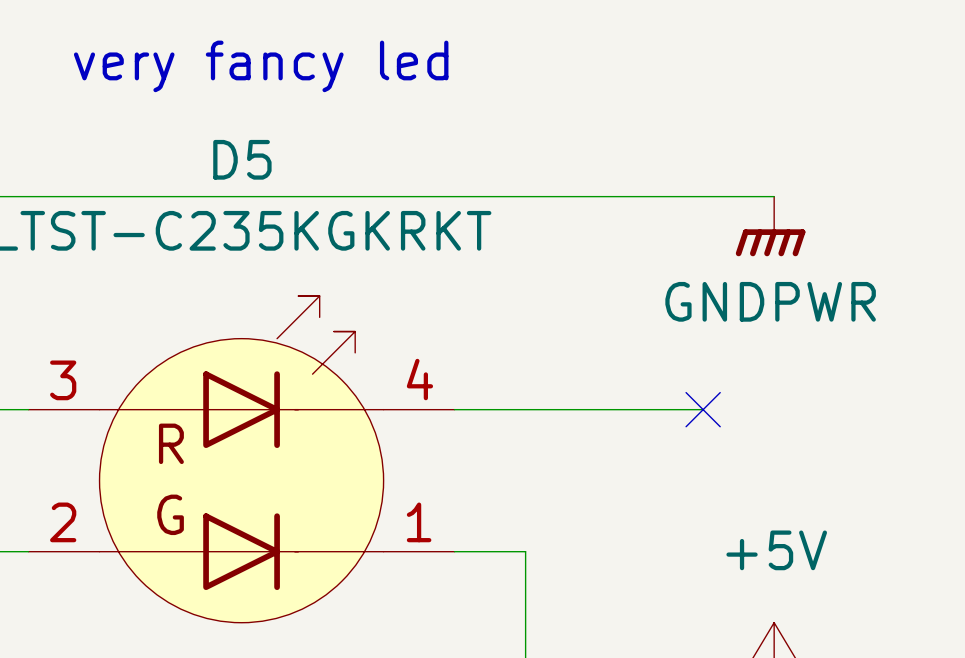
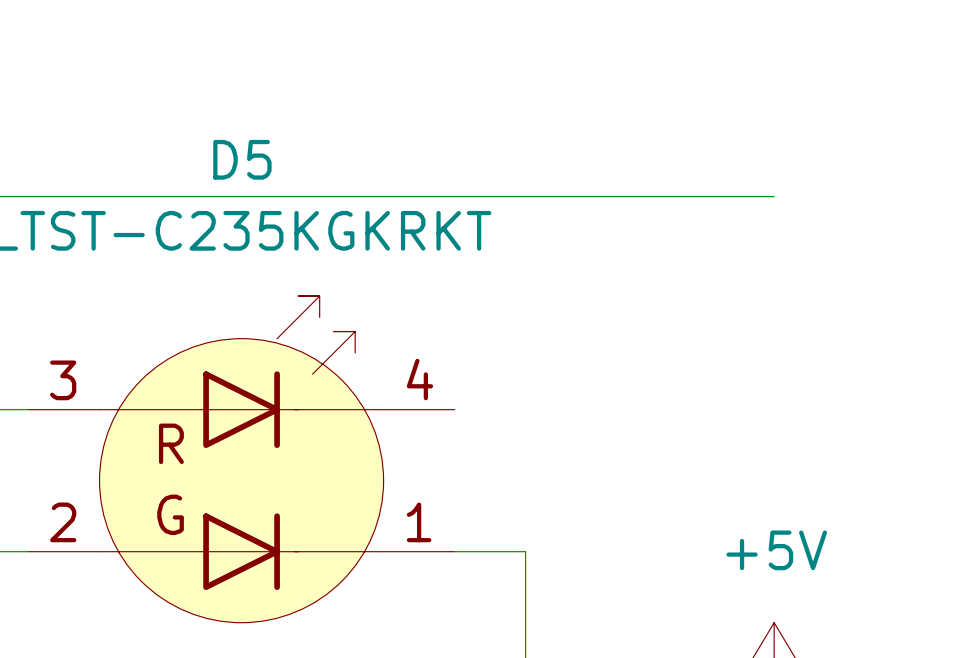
text: very fancy led (261, 66) -> none
power symbol: GNDPWR (770, 226) -> none
wire: (454, 409) (703, 409) -> none
no-connect mark: (703, 409) -> none

